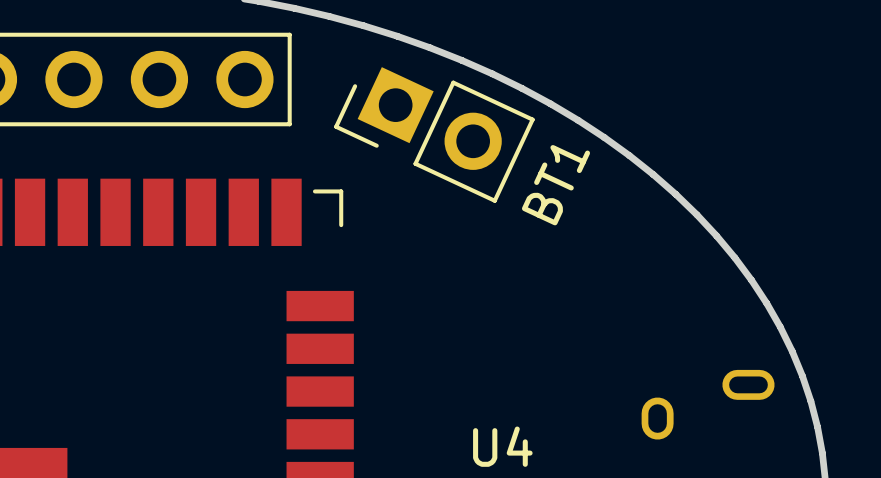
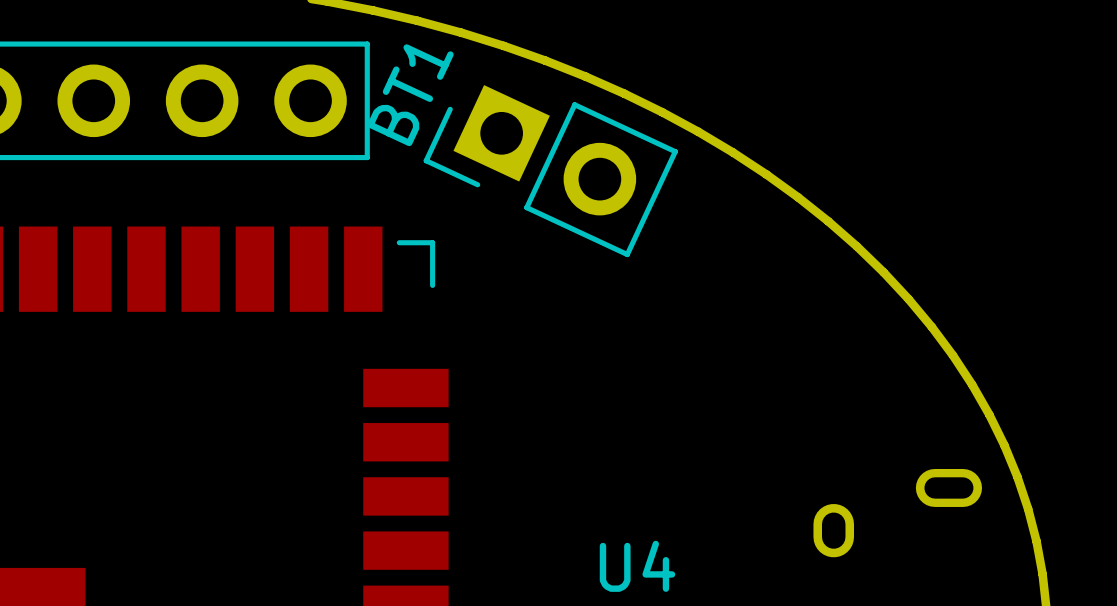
BT1 name position: BT1 (556, 185) -> BT1 (410, 95)

